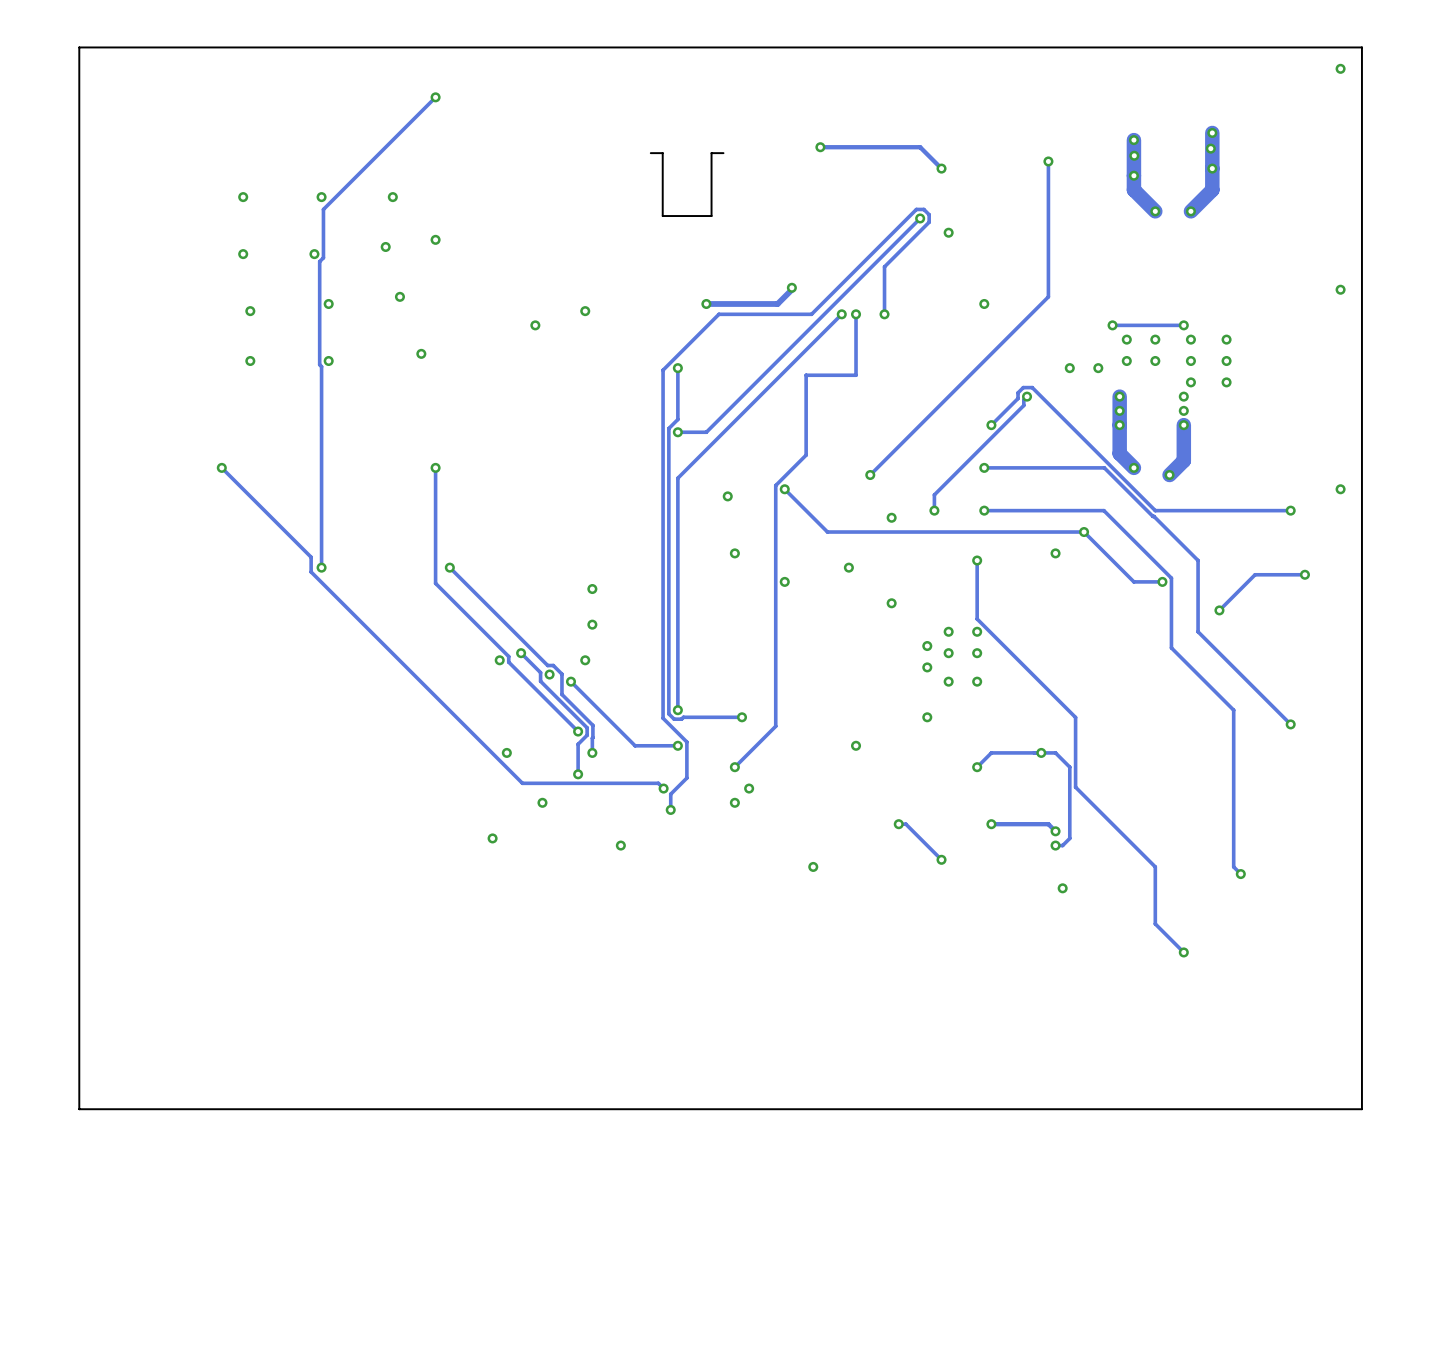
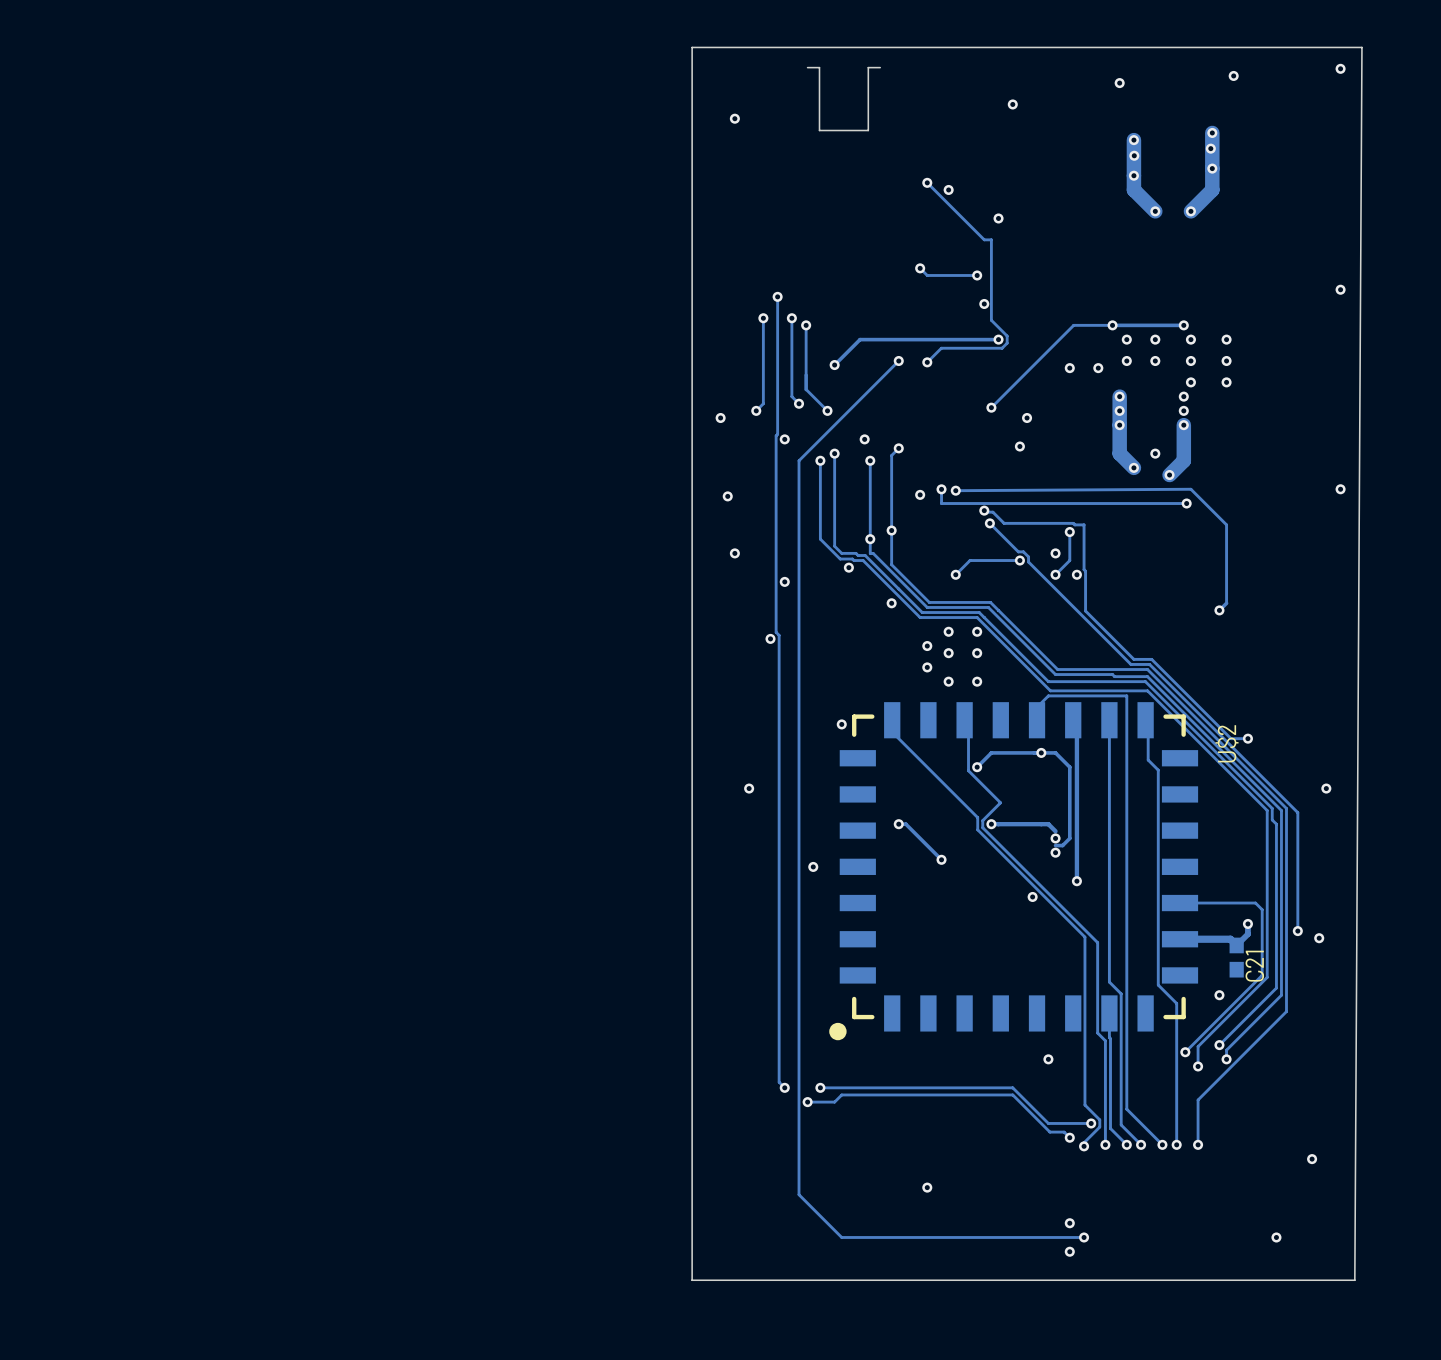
board edge: (1361, 47) (1361, 1109) (79, 1109) (79, 47) (692, 47) -> (1361, 47) (1354, 1280) (692, 1280) (692, 47)
via: none -> (1233, 75)
via: none -> (1119, 83)
track: (435, 97) (323, 209) (323, 257) (319, 261) (321, 567) -> none
via: (435, 97) -> none
via: none -> (1012, 104)
via: none -> (734, 118)
track: (820, 147) (920, 147) (941, 168) -> none
via: (820, 147) -> none
track: (1048, 161) (1048, 296) (870, 475) -> none
via: (1048, 161) -> none
via: (941, 168) -> none
track: none -> (927, 182) (984, 239) (991, 239) (991, 320) (1007, 336) (1007, 343) (1002, 348) (941, 348) (927, 362)
via: none -> (927, 182)
part position: (687, 184) -> (843, 99)
via: none -> (948, 189)
via: (243, 197) -> none
via: (321, 197) -> none
via: (392, 197) -> none
track: (920, 218) (706, 432) (677, 432) -> none
via: (920, 218) -> none
via: none -> (998, 218)
via: (948, 232) -> none
via: (435, 239) -> none
via: (385, 246) -> none
via: (243, 254) -> none
via: (314, 254) -> none
track: none -> (920, 268) (927, 275) (977, 275)
via: none -> (920, 268)
via: none -> (977, 275)
track: (791, 287) (777, 303) (706, 303) -> none
via: (791, 287) -> none
via: (399, 296) -> none
track: none -> (777, 296) (776, 632) (779, 635) (779, 1082) (784, 1087)
via: none -> (777, 296)
via: (328, 303) -> none
via: (706, 303) -> none
via: (250, 311) -> none
via: (585, 311) -> none
track: (841, 314) (677, 478) (677, 710) -> none
via: (841, 314) -> none
track: (856, 314) (856, 375) (806, 375) -> (806, 325) (806, 375)
via: (856, 314) -> none
track: (884, 314) (884, 266) (929, 222) (929, 214) (923, 209) (916, 209) (811, 314) (718, 314) (663, 370) (663, 718) (686, 742) (686, 778) (670, 794) (670, 809) -> none
via: (884, 314) -> none
track: none -> (763, 318) (763, 403) (756, 410)
via: none -> (763, 318)
track: none -> (791, 318) (791, 396) (799, 403)
via: none -> (791, 318)
via: (535, 325) -> none
via: none -> (806, 325)
track: none -> (1112, 325) (1073, 325) (991, 407)
track: none -> (998, 339) (860, 339) (834, 365)
via: none -> (998, 339)
via: (421, 353) -> none
via: (250, 360) -> none
via: (328, 360) -> none
track: none -> (898, 360) (799, 460) (799, 1194) (841, 1237) (1084, 1237)
via: none -> (898, 360)
via: none -> (927, 362)
via: none -> (834, 365)
track: (677, 368) (677, 419) (668, 428) (668, 713) (674, 719) (683, 717) (742, 717) -> none
via: (677, 368) -> none
track: (806, 389) (806, 455) (775, 485) (775, 726) (734, 767) -> (806, 389) (827, 410)
track: (1027, 396) (1023, 399) (1023, 405) (934, 494) (934, 510) -> none
via: (1027, 396) -> none
via: none -> (799, 403)
via: none -> (756, 410)
via: none -> (827, 410)
via: none -> (720, 418)
via: none -> (1027, 418)
track: (991, 425) (1018, 398) (1018, 392) (1023, 387) (1032, 387) (1155, 510) (1290, 510) -> none
via position: (991, 425) -> (991, 407)
via: (677, 432) -> none
via: none -> (784, 439)
via: none -> (864, 439)
via: none -> (1019, 446)
track: none -> (898, 448) (891, 455) (891, 564) (929, 602) (990, 602) (1057, 669) (1147, 669) (1286, 808) (1286, 1011) (1198, 1100) (1198, 1144)
via: none -> (898, 448)
track: none -> (834, 453) (834, 546) (841, 553) (865, 555) (922, 612) (979, 612) (1048, 681) (1145, 681) (1272, 808) (1272, 819) (1276, 824) (1276, 988) (1219, 1045)
via: none -> (834, 453)
via: none -> (1155, 453)
track: none -> (820, 460) (820, 539) (840, 559) (863, 560) (920, 617) (977, 617) (1050, 690) (1147, 690) (1267, 810) (1267, 977) (1198, 1046) (1198, 1066)
via: none -> (820, 460)
track: none -> (870, 460) (870, 553) (873, 553) (927, 607) (988, 607) (1055, 674) (1147, 676) (1281, 810) (1281, 995) (1226, 1050) (1226, 1059)
track: (221, 467) (311, 557) (311, 571) (522, 783) (658, 783) (663, 788) -> none
via: (221, 467) -> none
track: (435, 467) (435, 583) (508, 656) (508, 662) (578, 731) -> none
via: (435, 467) -> none
track: (984, 467) (1104, 467) (1198, 560) (1198, 631) (1290, 724) -> none
via: (984, 467) -> none
via position: (870, 475) -> (870, 460)
track: (784, 489) (827, 532) (1084, 532) (1133, 581) (1162, 581) -> none
via: (784, 489) -> none
track: none -> (941, 489) (941, 503) (1186, 503)
via: none -> (941, 489)
via: none -> (955, 490)
via: none -> (920, 494)
via: none -> (1186, 503)
via: (934, 510) -> none
track: (984, 510) (1103, 510) (1171, 578) (1171, 647) (1233, 710) (1233, 866) (1240, 874) -> none
via: (1290, 510) -> none
track: none -> (983, 512) (992, 512) (1004, 523) (1084, 524) (1085, 611) (1133, 659) (1151, 659) (1231, 738) (1247, 738)
via position: (891, 517) -> (891, 530)
track: none -> (989, 523) (1018, 551) (1023, 551) (1028, 556) (1028, 562) (1130, 664) (1149, 664) (1297, 812) (1297, 931)
via: none -> (989, 523)
track: none -> (1069, 532) (1069, 560) (1055, 574)
via position: (1084, 532) -> (1069, 532)
via: none -> (870, 539)
track: (977, 560) (977, 619) (1075, 717) (1075, 787) (1155, 866) (1155, 923) (1183, 952) -> none
via: (977, 560) -> none
track: none -> (1019, 560) (970, 560) (955, 574)
via: none -> (1019, 560)
via: (321, 567) -> none
track: (449, 567) (547, 665) (553, 665) (561, 674) (561, 694) (592, 725) (592, 752) -> none
via: (449, 567) -> none
via: none -> (955, 574)
via: none -> (1055, 574)
via: none -> (1076, 574)
track: (1304, 574) (1255, 574) (1226, 603) -> (955, 490) (1190, 489) (1226, 524) (1226, 603)
via: (1304, 574) -> none
via: (1162, 581) -> none
via: (592, 589) -> none
via: (592, 624) -> none
via: none -> (770, 638)
track: (521, 653) (540, 672) (540, 681) (587, 727) (587, 735) (578, 744) (578, 774) -> none
via: (521, 653) -> none
via: (499, 660) -> none
via: (585, 660) -> none
via: (549, 674) -> none
track: (570, 681) (635, 745) (677, 745) -> none
via: (570, 681) -> none
via: (677, 710) -> none
via: (742, 717) -> none
via: (927, 717) -> none
track: none -> (892, 720) (891, 731) (977, 817) (977, 829) (1084, 937) (1084, 1105) (1099, 1119) (1099, 1127) (1084, 1142) (1084, 1146)
track: none -> (964, 720) (968, 724) (968, 770) (1000, 802) (982, 820) (982, 827) (1097, 942) (1097, 1033) (1105, 1040) (1105, 1144)
track: none -> (1037, 720) (1034, 717) (1034, 710) (1048, 695) (1126, 695) (1126, 1109) (1162, 1144)
track: none -> (1073, 720) (1076, 723) (1076, 881)
track: none -> (1109, 720) (1109, 982) (1121, 993) (1121, 1124) (1141, 1144)
track: none -> (1145, 720) (1148, 722) (1148, 760) (1158, 770) (1158, 985) (1176, 1003) (1176, 1144)
via: (1290, 724) -> none
via: (578, 731) -> none
via: none -> (1247, 738)
via: (677, 745) -> none
via position: (856, 745) -> (841, 724)
via: (506, 752) -> none
via: (592, 752) -> none
via: (734, 767) -> none
via: (578, 774) -> none
via: (663, 788) -> none
via: none -> (1326, 788)
via: (542, 802) -> none
via: (734, 802) -> none
via: (670, 809) -> none
via: (1055, 831) -> none
via: (492, 838) -> none
via: none -> (1055, 838)
via: (620, 845) -> none
via: (1055, 845) -> none
via: none -> (1055, 852)
U$2: none -> (1013, 871)
via: (1240, 874) -> none
via: none -> (1076, 881)
via: (1062, 888) -> none
via: none -> (1032, 896)
track: none -> (1180, 903) (1255, 903) (1262, 909) (1262, 975) (1185, 1052)
track: none -> (1247, 923) (1247, 934) (1236, 945) (1230, 939) (1180, 939)
via: none -> (1247, 923)
via: none -> (1297, 931)
via: none -> (1319, 938)
via: (1183, 952) -> none
C21: none -> (1236, 957)
via: none -> (1219, 995)
track: none -> (1109, 1013) (1110, 1128) (1126, 1144)
via: none -> (1219, 1045)
via: none -> (1185, 1052)
via: none -> (1048, 1059)
via: none -> (1226, 1059)
via: none -> (1198, 1066)
via: none -> (784, 1087)
track: none -> (820, 1087) (1012, 1087) (1048, 1123) (1091, 1123)
via: none -> (820, 1087)
track: none -> (807, 1102) (834, 1102) (841, 1094) (1012, 1094) (1049, 1132) (1064, 1132) (1069, 1137)
via: none -> (807, 1102)
via: none -> (1091, 1123)
via: none -> (1069, 1137)
via: none -> (1105, 1144)
via: none -> (1126, 1144)
via: none -> (1141, 1144)
via: none -> (1162, 1144)
via: none -> (1176, 1144)
via: none -> (1198, 1144)
via: none -> (1084, 1146)
via: none -> (1312, 1159)
via: none -> (927, 1187)
via: none -> (1069, 1223)
via: none -> (1084, 1237)
via: none -> (1276, 1237)
via: none -> (1069, 1251)

